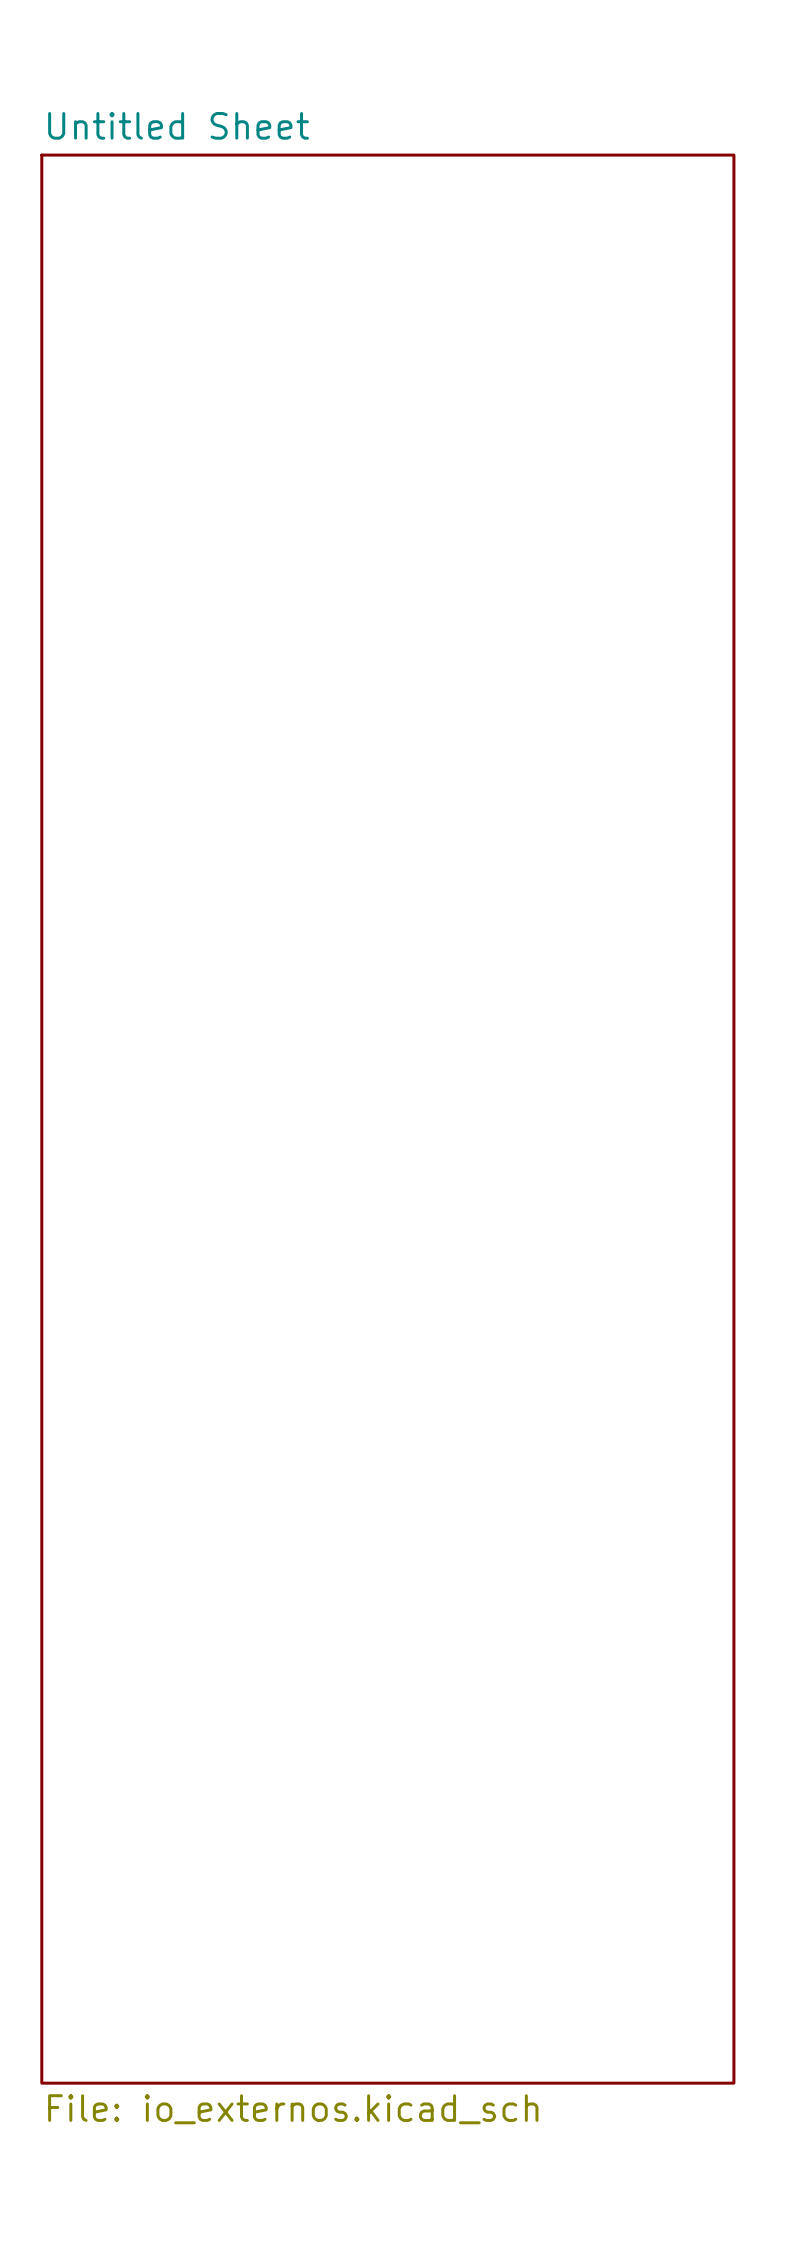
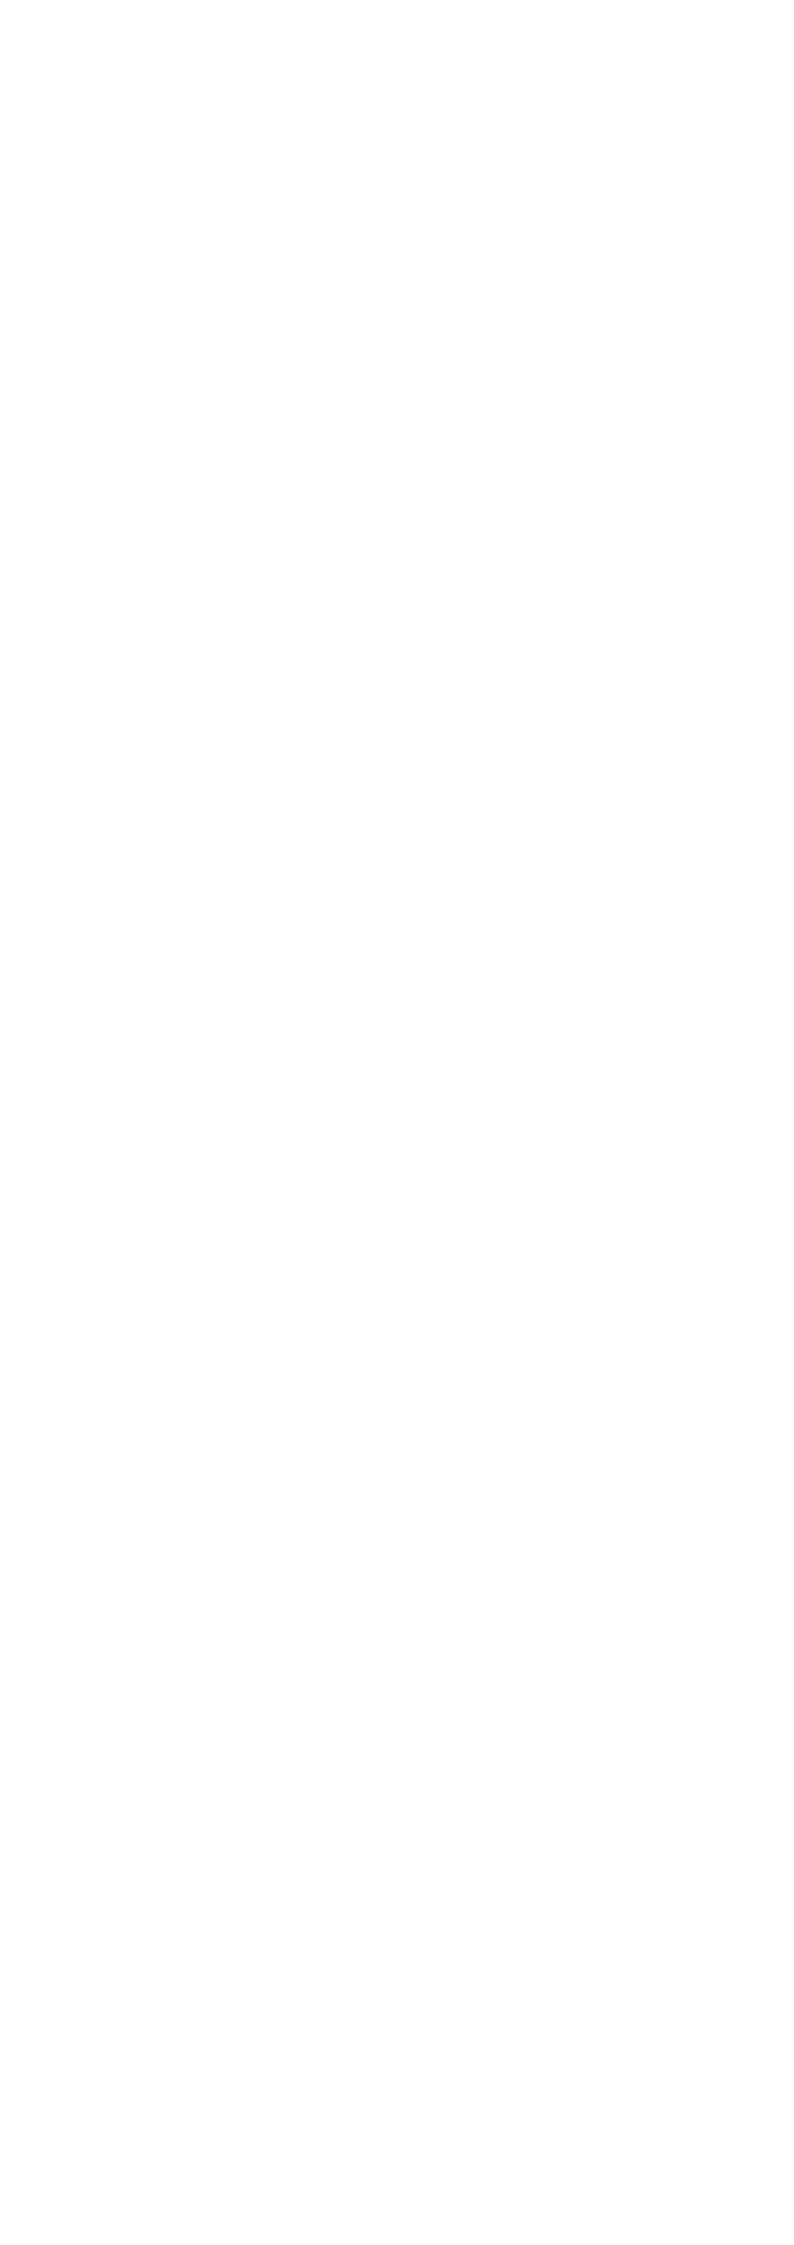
sheet Untitled Sheet: File: io_externos.kicad_sch (387, 1119) -> none

